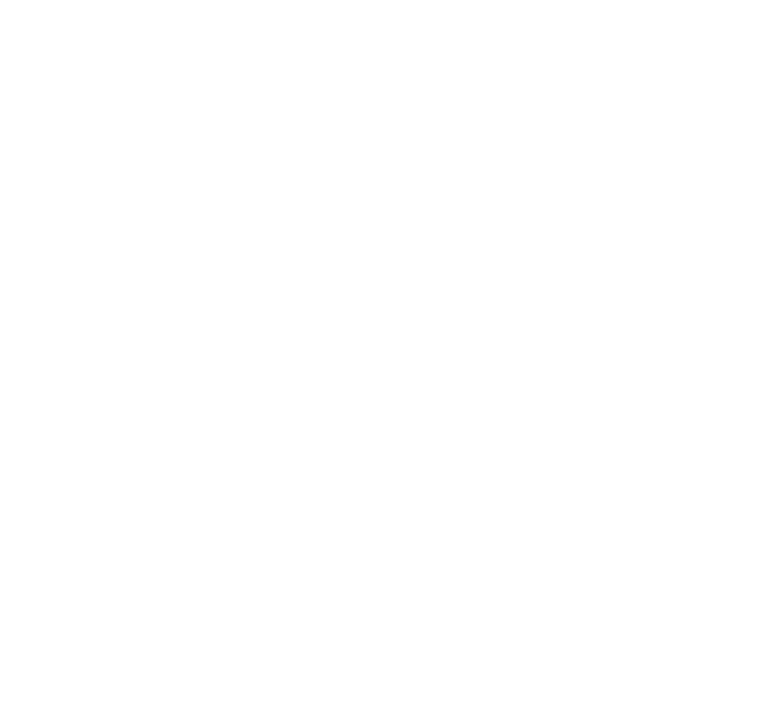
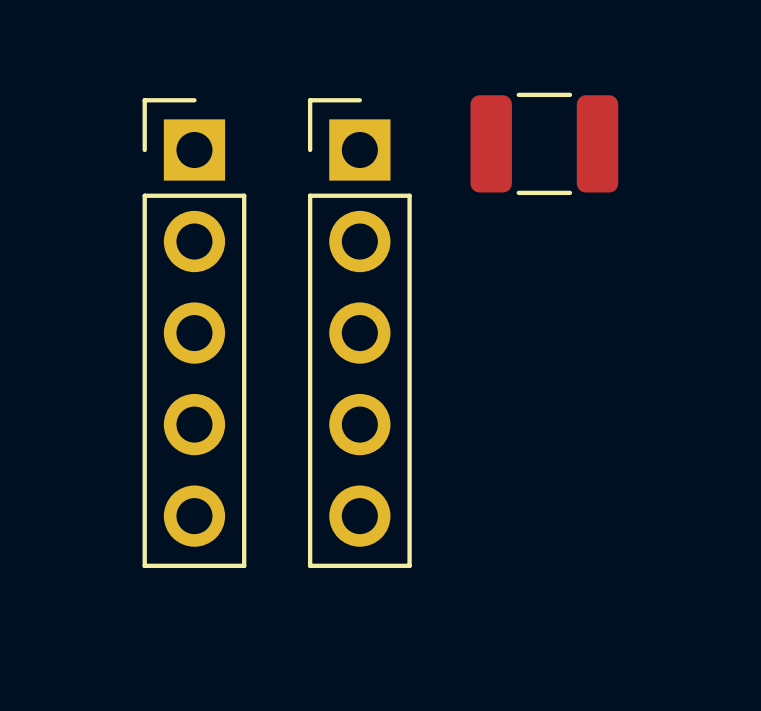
part: none -> (544, 143)
part: none -> (194, 333)
part: none -> (359, 333)

